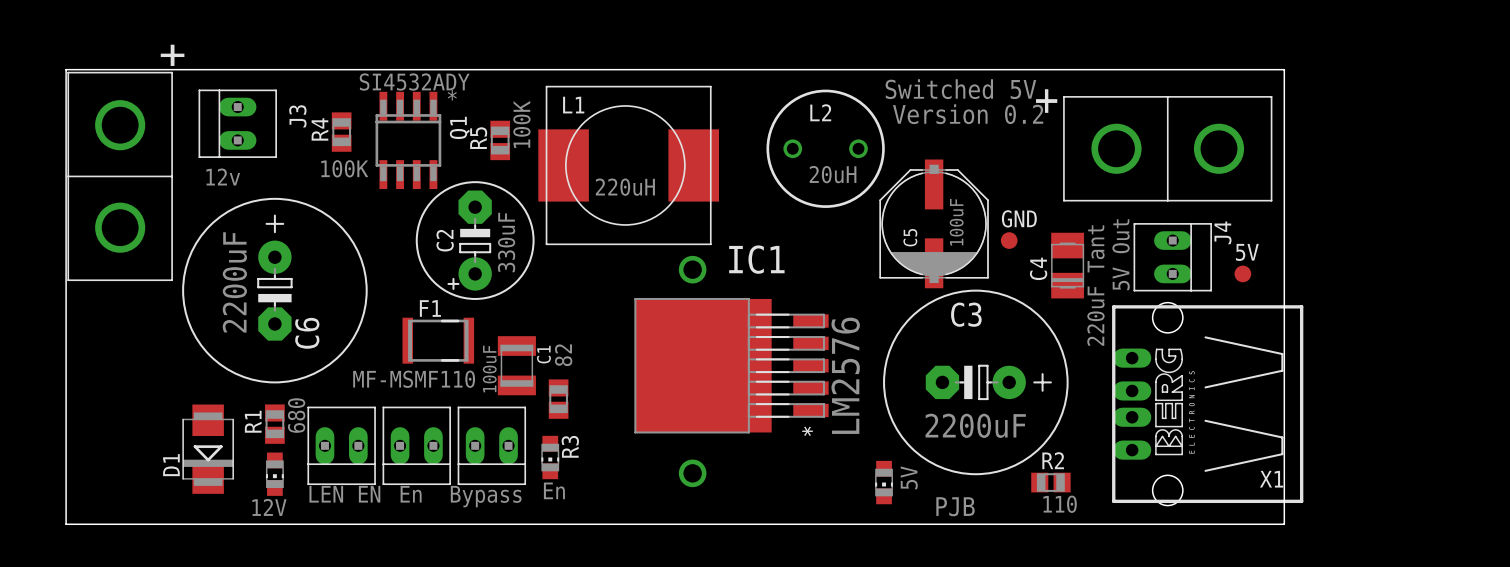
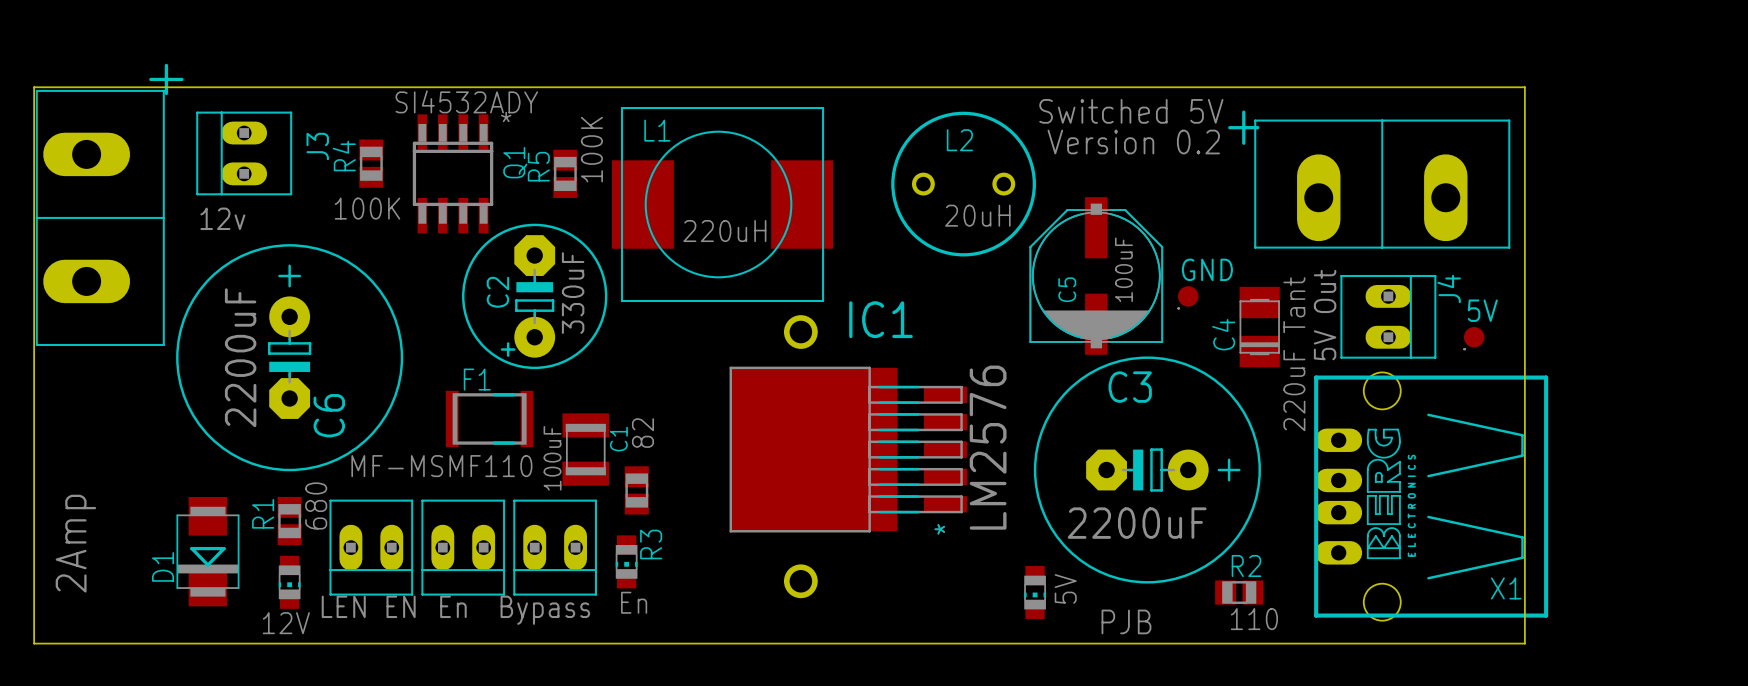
part footprint: [67, 71, 173, 282] -> [35, 89, 165, 346]
part footprint: [1063, 96, 1273, 202] -> [1254, 119, 1511, 249]
text: none -> 2Amp (75, 543)

